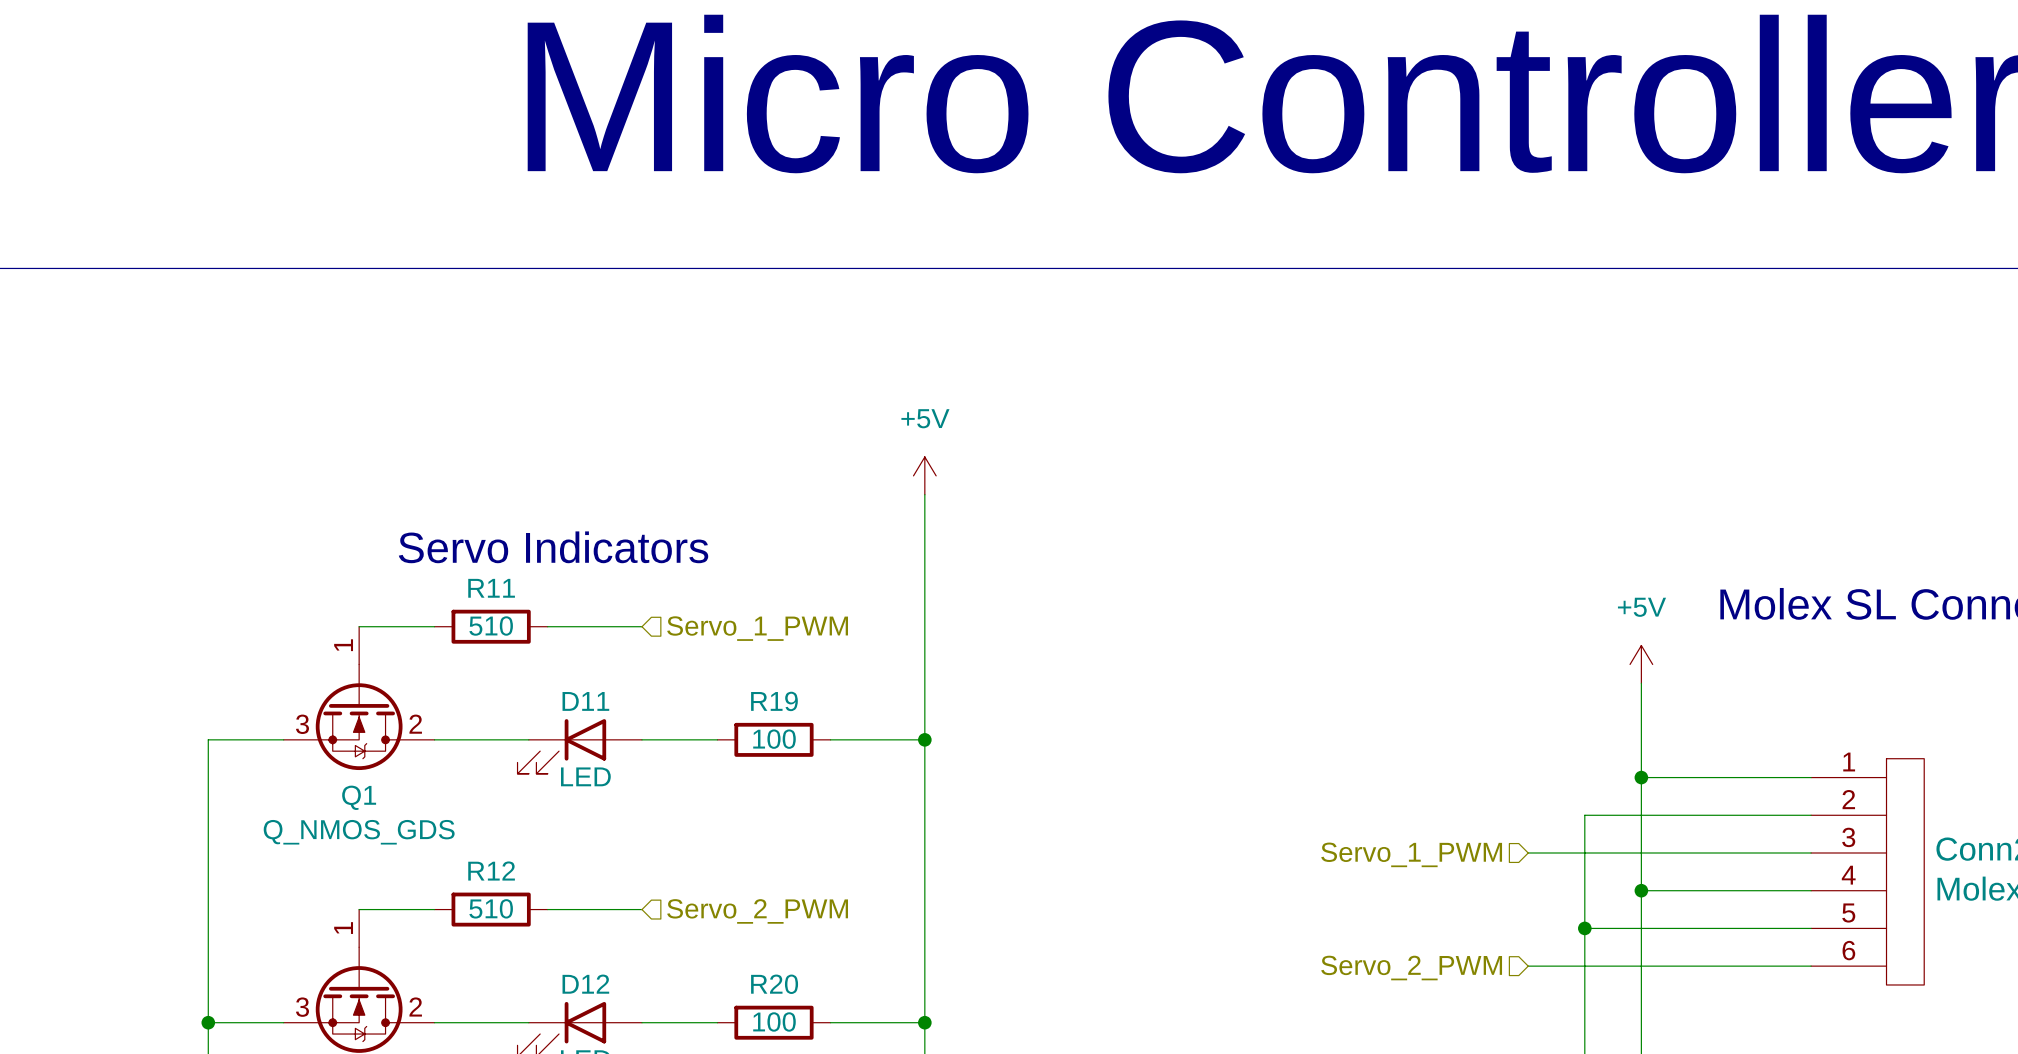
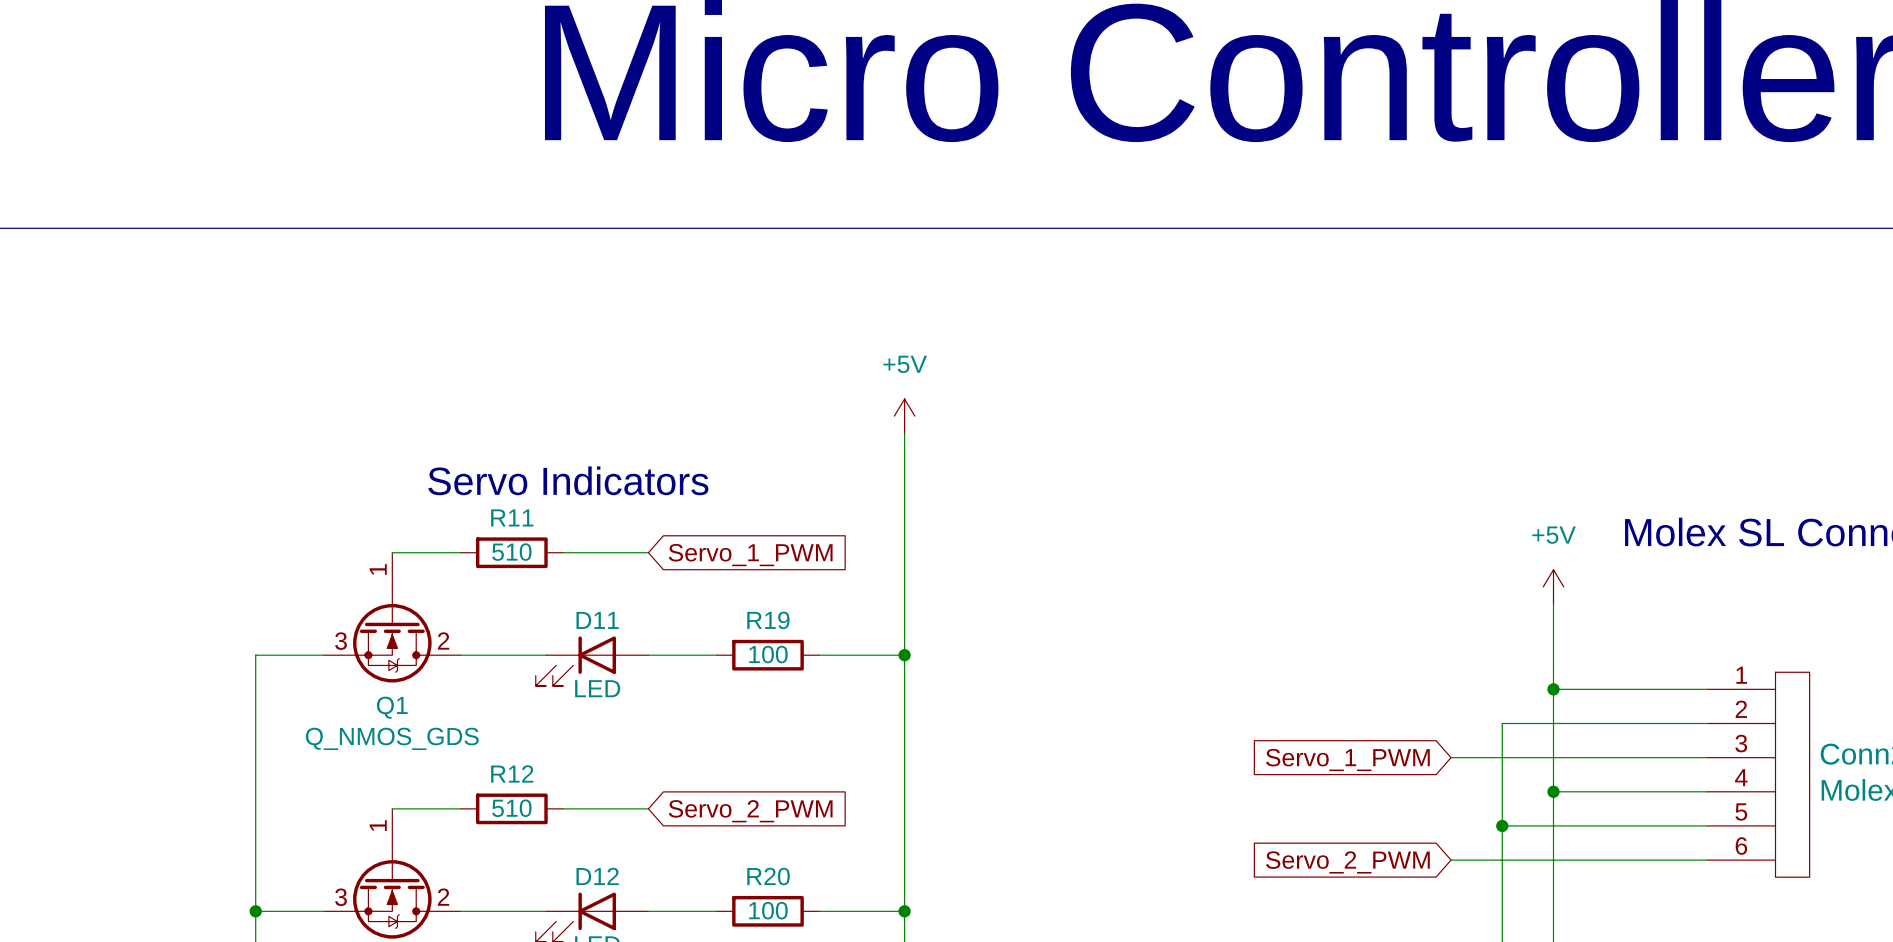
hierarchical label: Servo_1_PWM (757, 628) -> none
global label: none -> Servo_1_PWM (750, 555)
hierarchical label: Servo_1_PWM (1411, 854) -> none
global label: none -> Servo_1_PWM (1347, 759)
hierarchical label: Servo_2_PWM (757, 911) -> none
global label: none -> Servo_2_PWM (750, 811)
hierarchical label: Servo_2_PWM (1411, 968) -> none
global label: none -> Servo_2_PWM (1347, 862)

